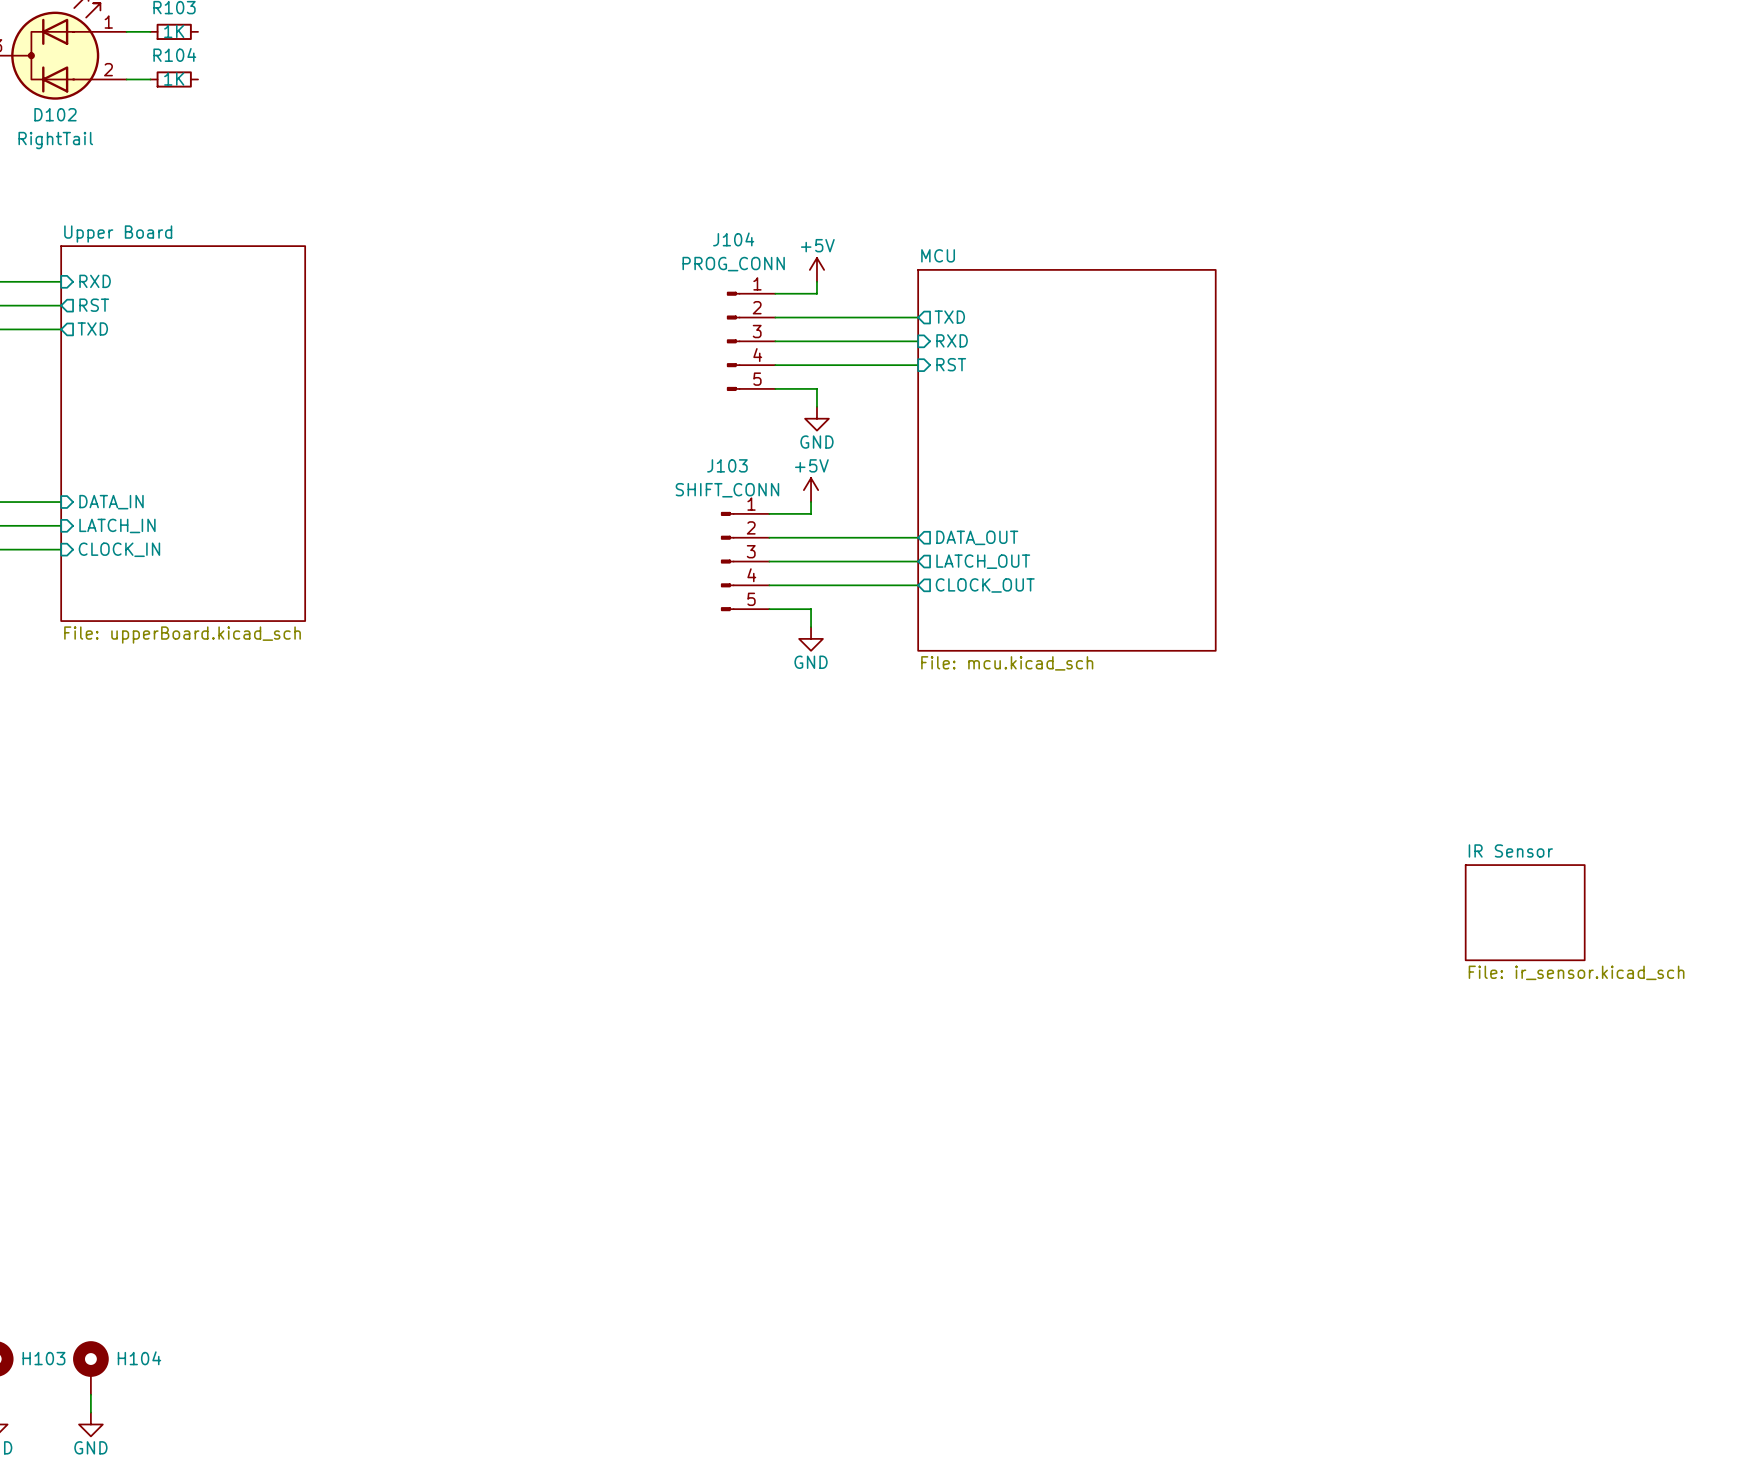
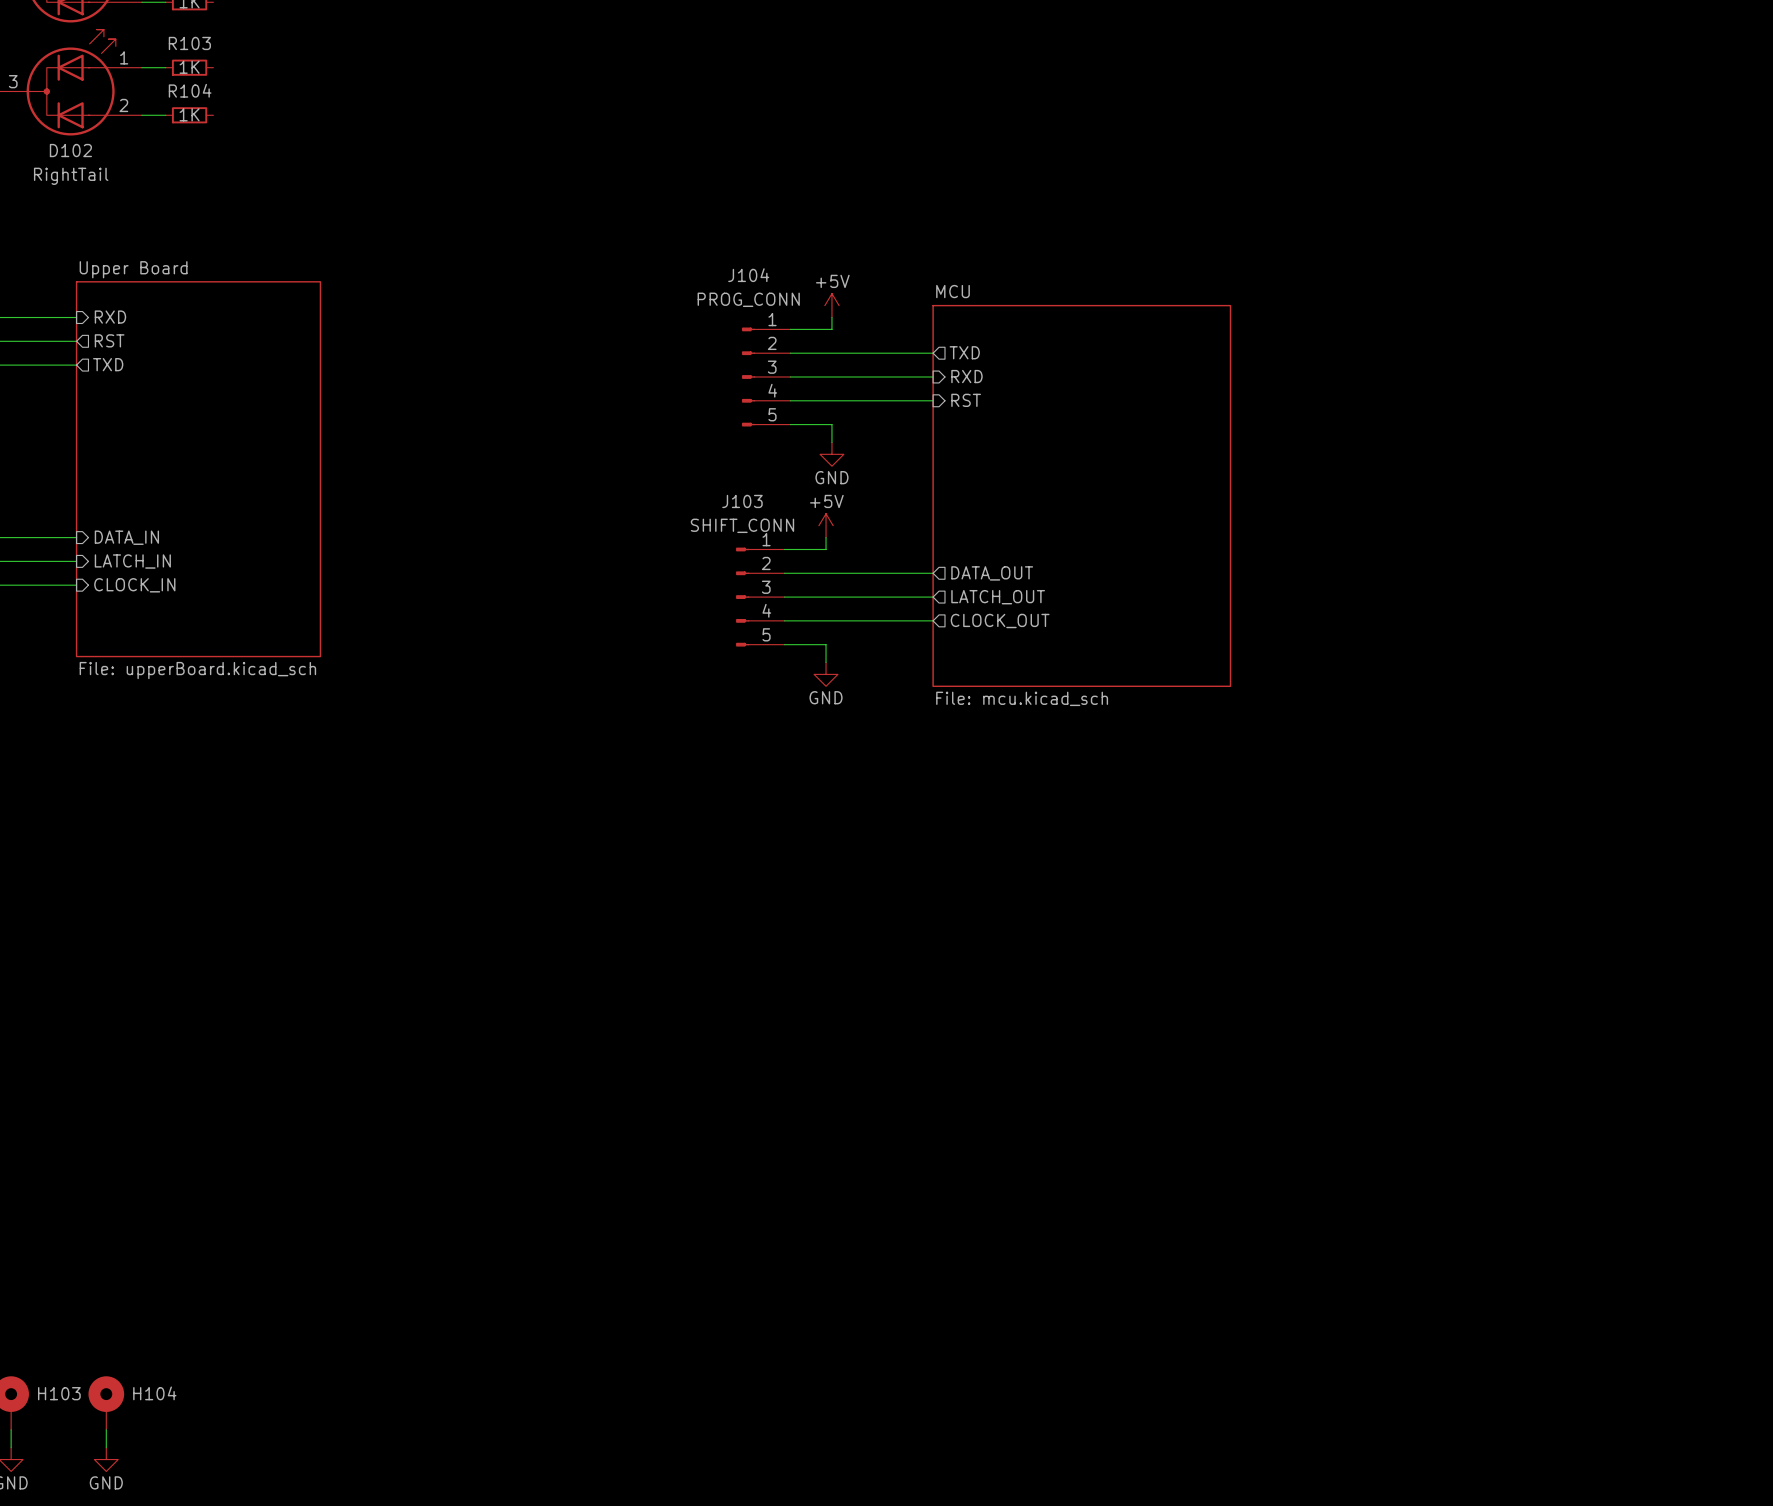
sheet IR Sensor: File: ir_sensor.kicad_sch (1525, 912) -> none

